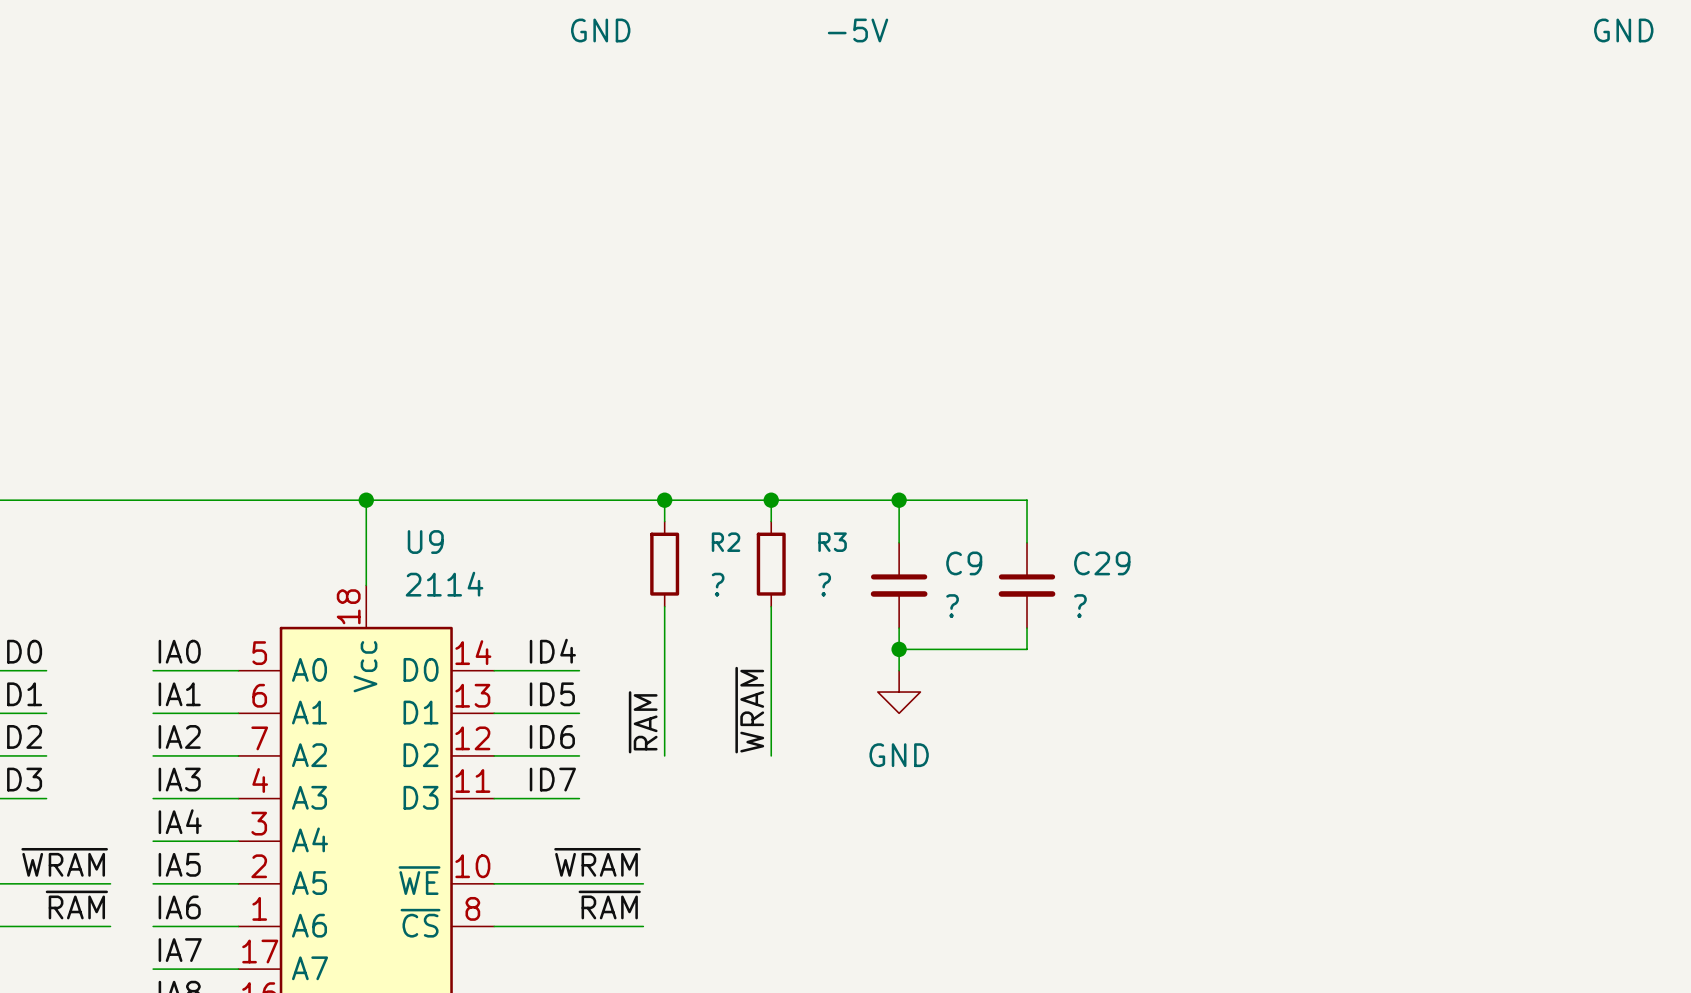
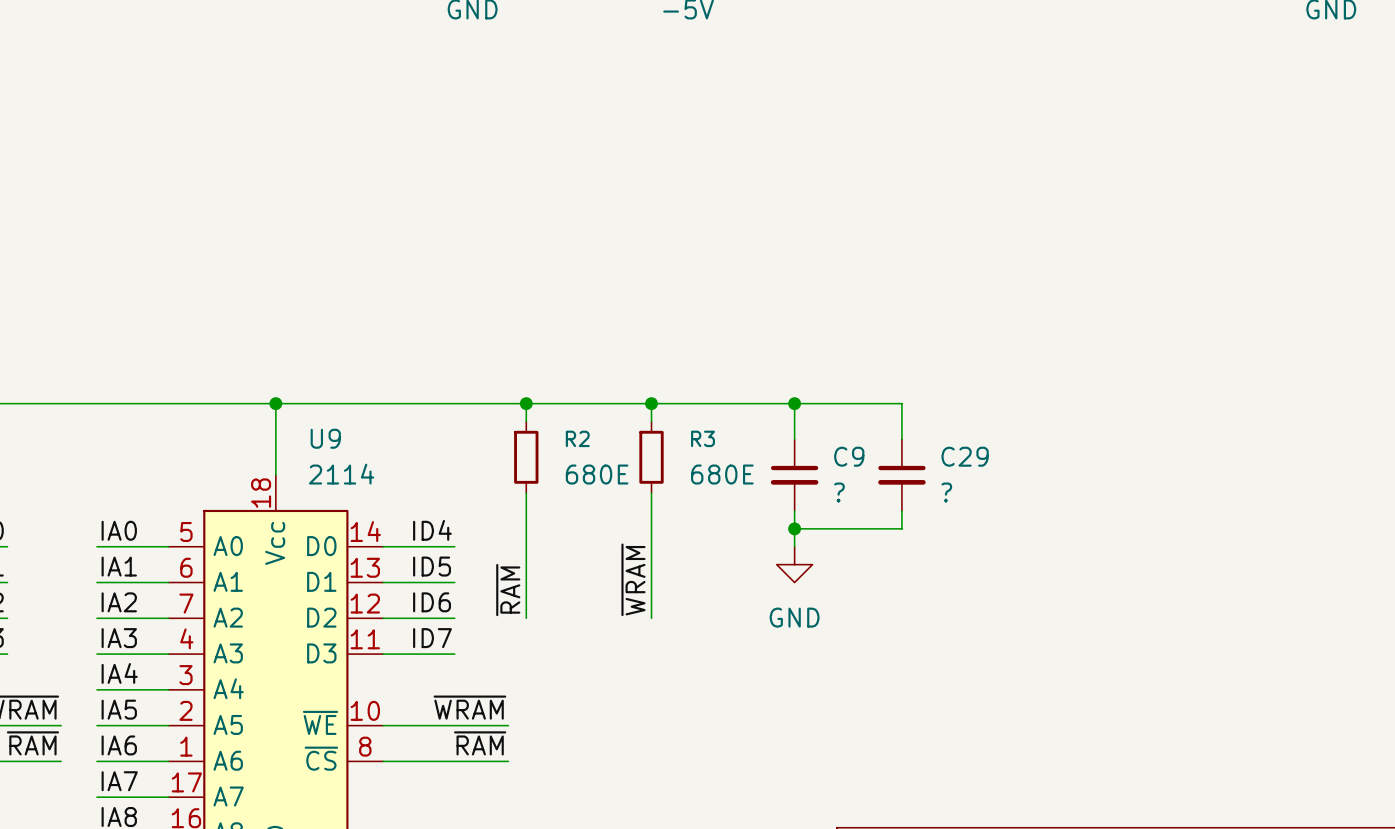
wire: (771, 500) (771, 521) -> (651, 403) (651, 421)
junction: (771, 500) -> none
junction: none -> (651, 403)
wire: (899, 500) (899, 542) -> (794, 403) (794, 439)
junction: (899, 500) -> none
junction: none -> (794, 403)
wire: (1027, 500) (1027, 542) -> (830, 403) (901, 403) (901, 439)
R3 position: (771, 564) -> (651, 457)
R2 value: ? (718, 584) -> 680E (597, 474)
R3 value: ? (824, 584) -> 680E (722, 474)
C9 position: (899, 585) -> (794, 475)
C29 position: (1027, 585) -> (901, 475)
wire: (771, 606) (771, 755) -> (651, 493) (651, 618)
wire: (899, 628) (899, 670) -> (794, 510) (794, 546)
wire: (1027, 628) (1027, 649) -> (901, 510) (901, 528) (830, 528)
wire: (899, 649) (984, 649) -> none
junction position: (899, 649) -> (794, 528)
power symbol position: GND (899, 692) -> GND (794, 564)
label position: ~{WRAM} (749, 710) -> ~{WRAM} (633, 579)

